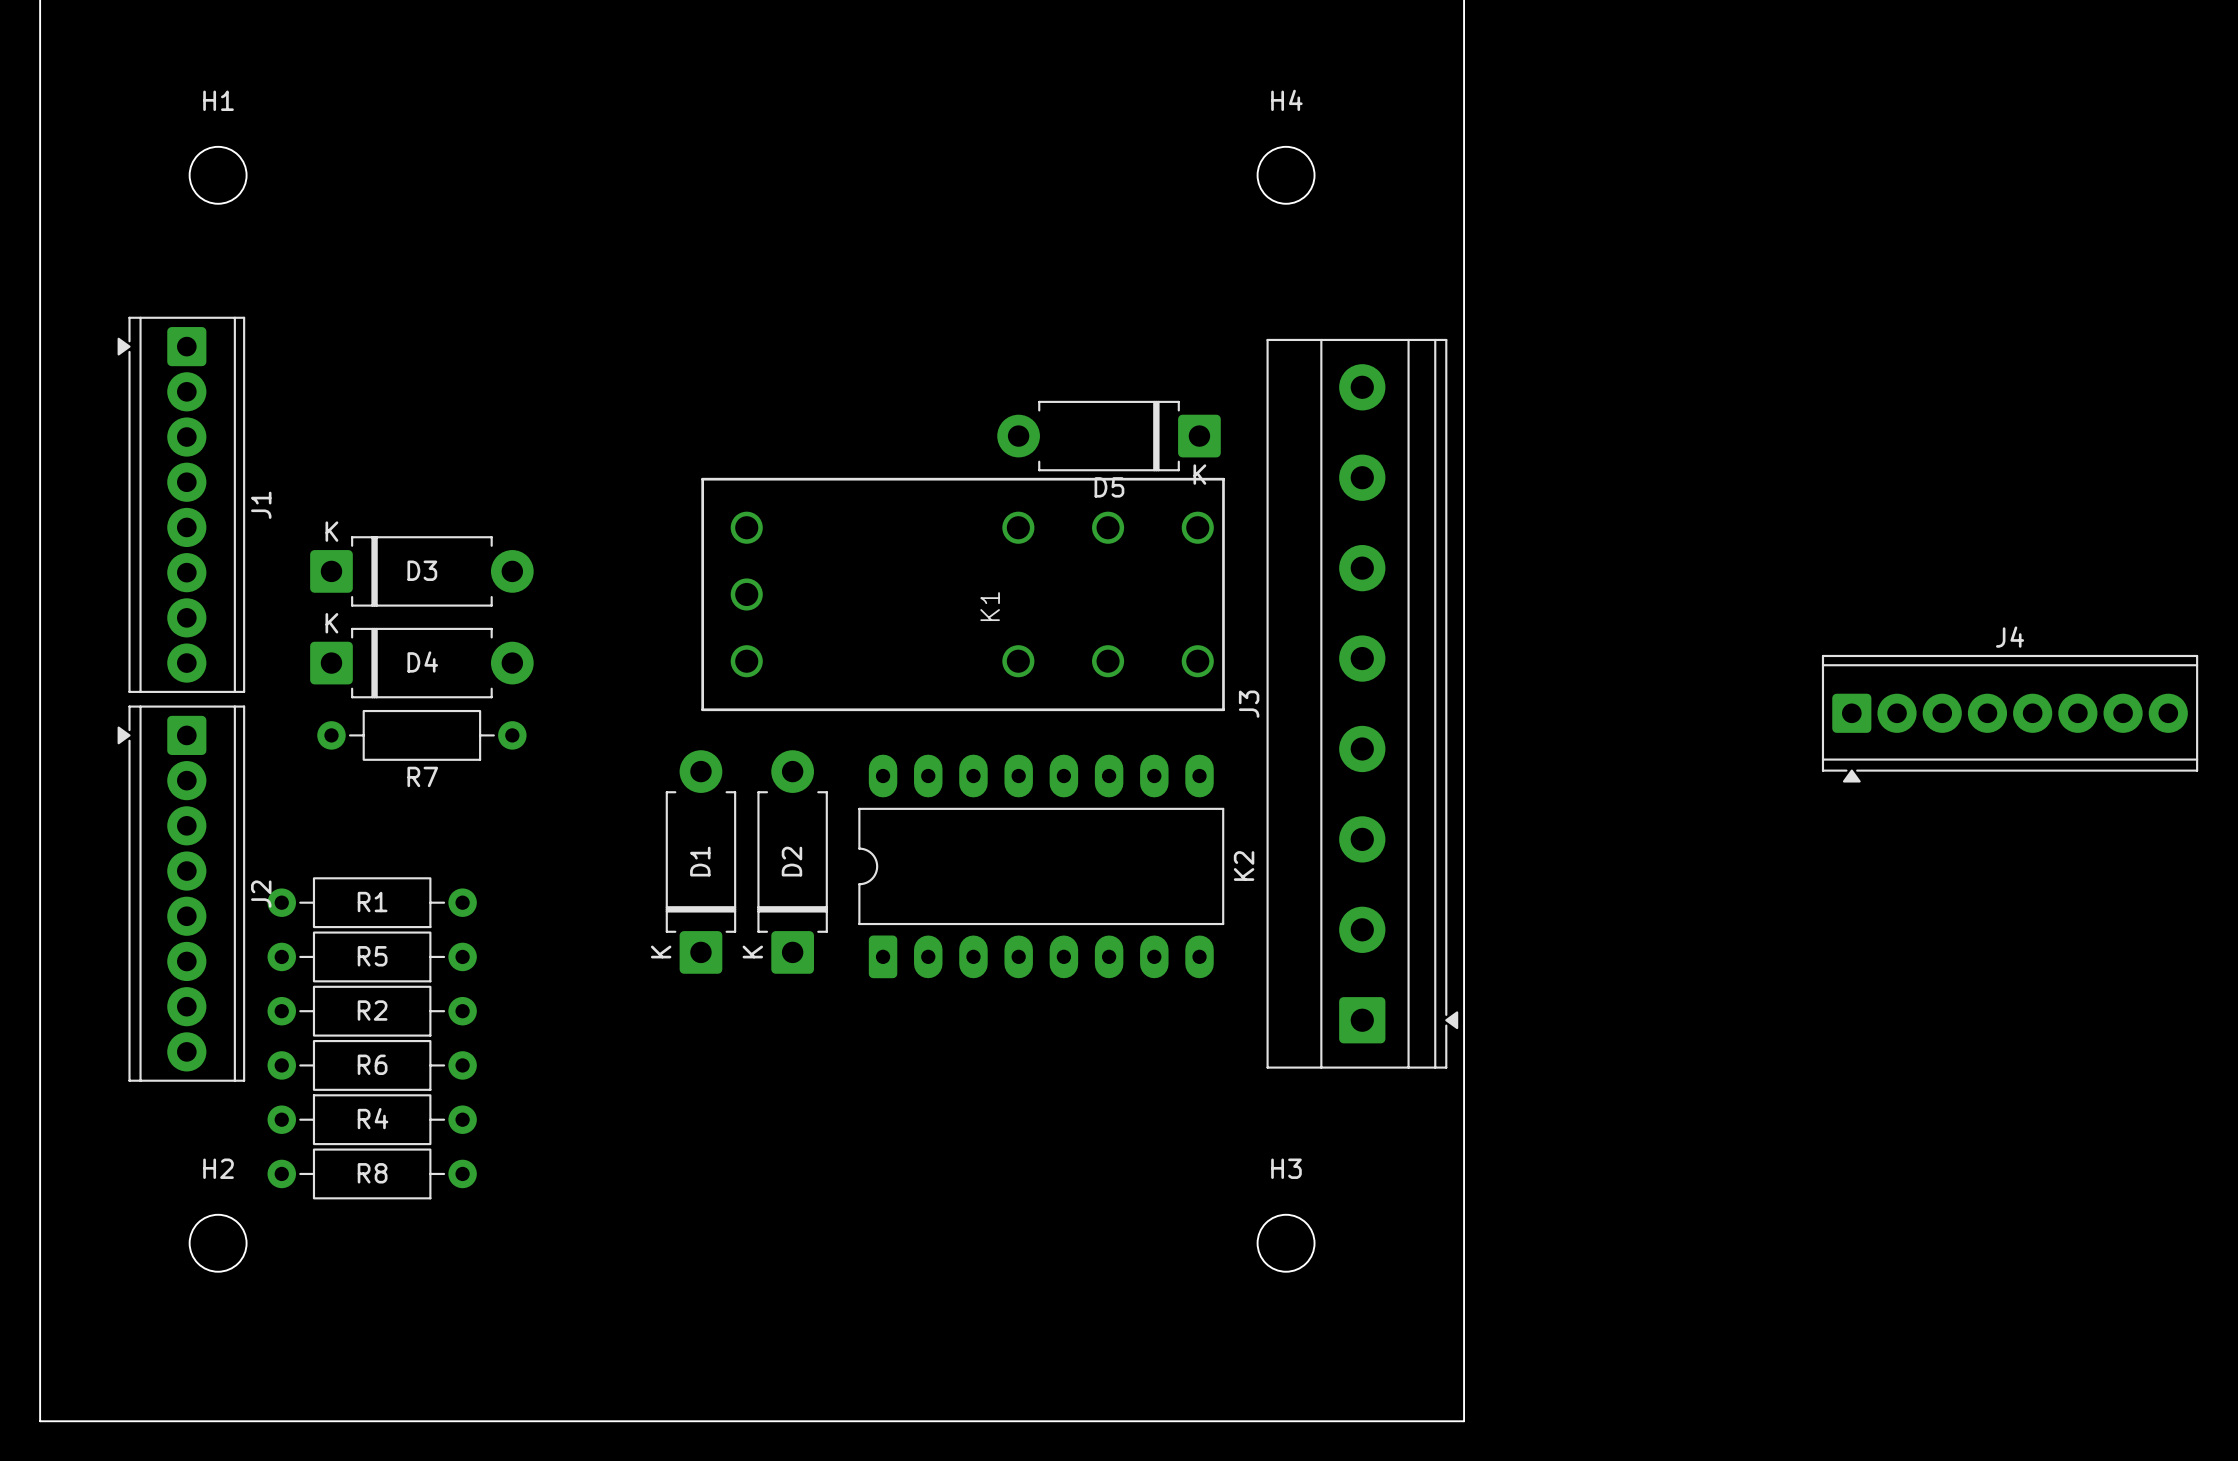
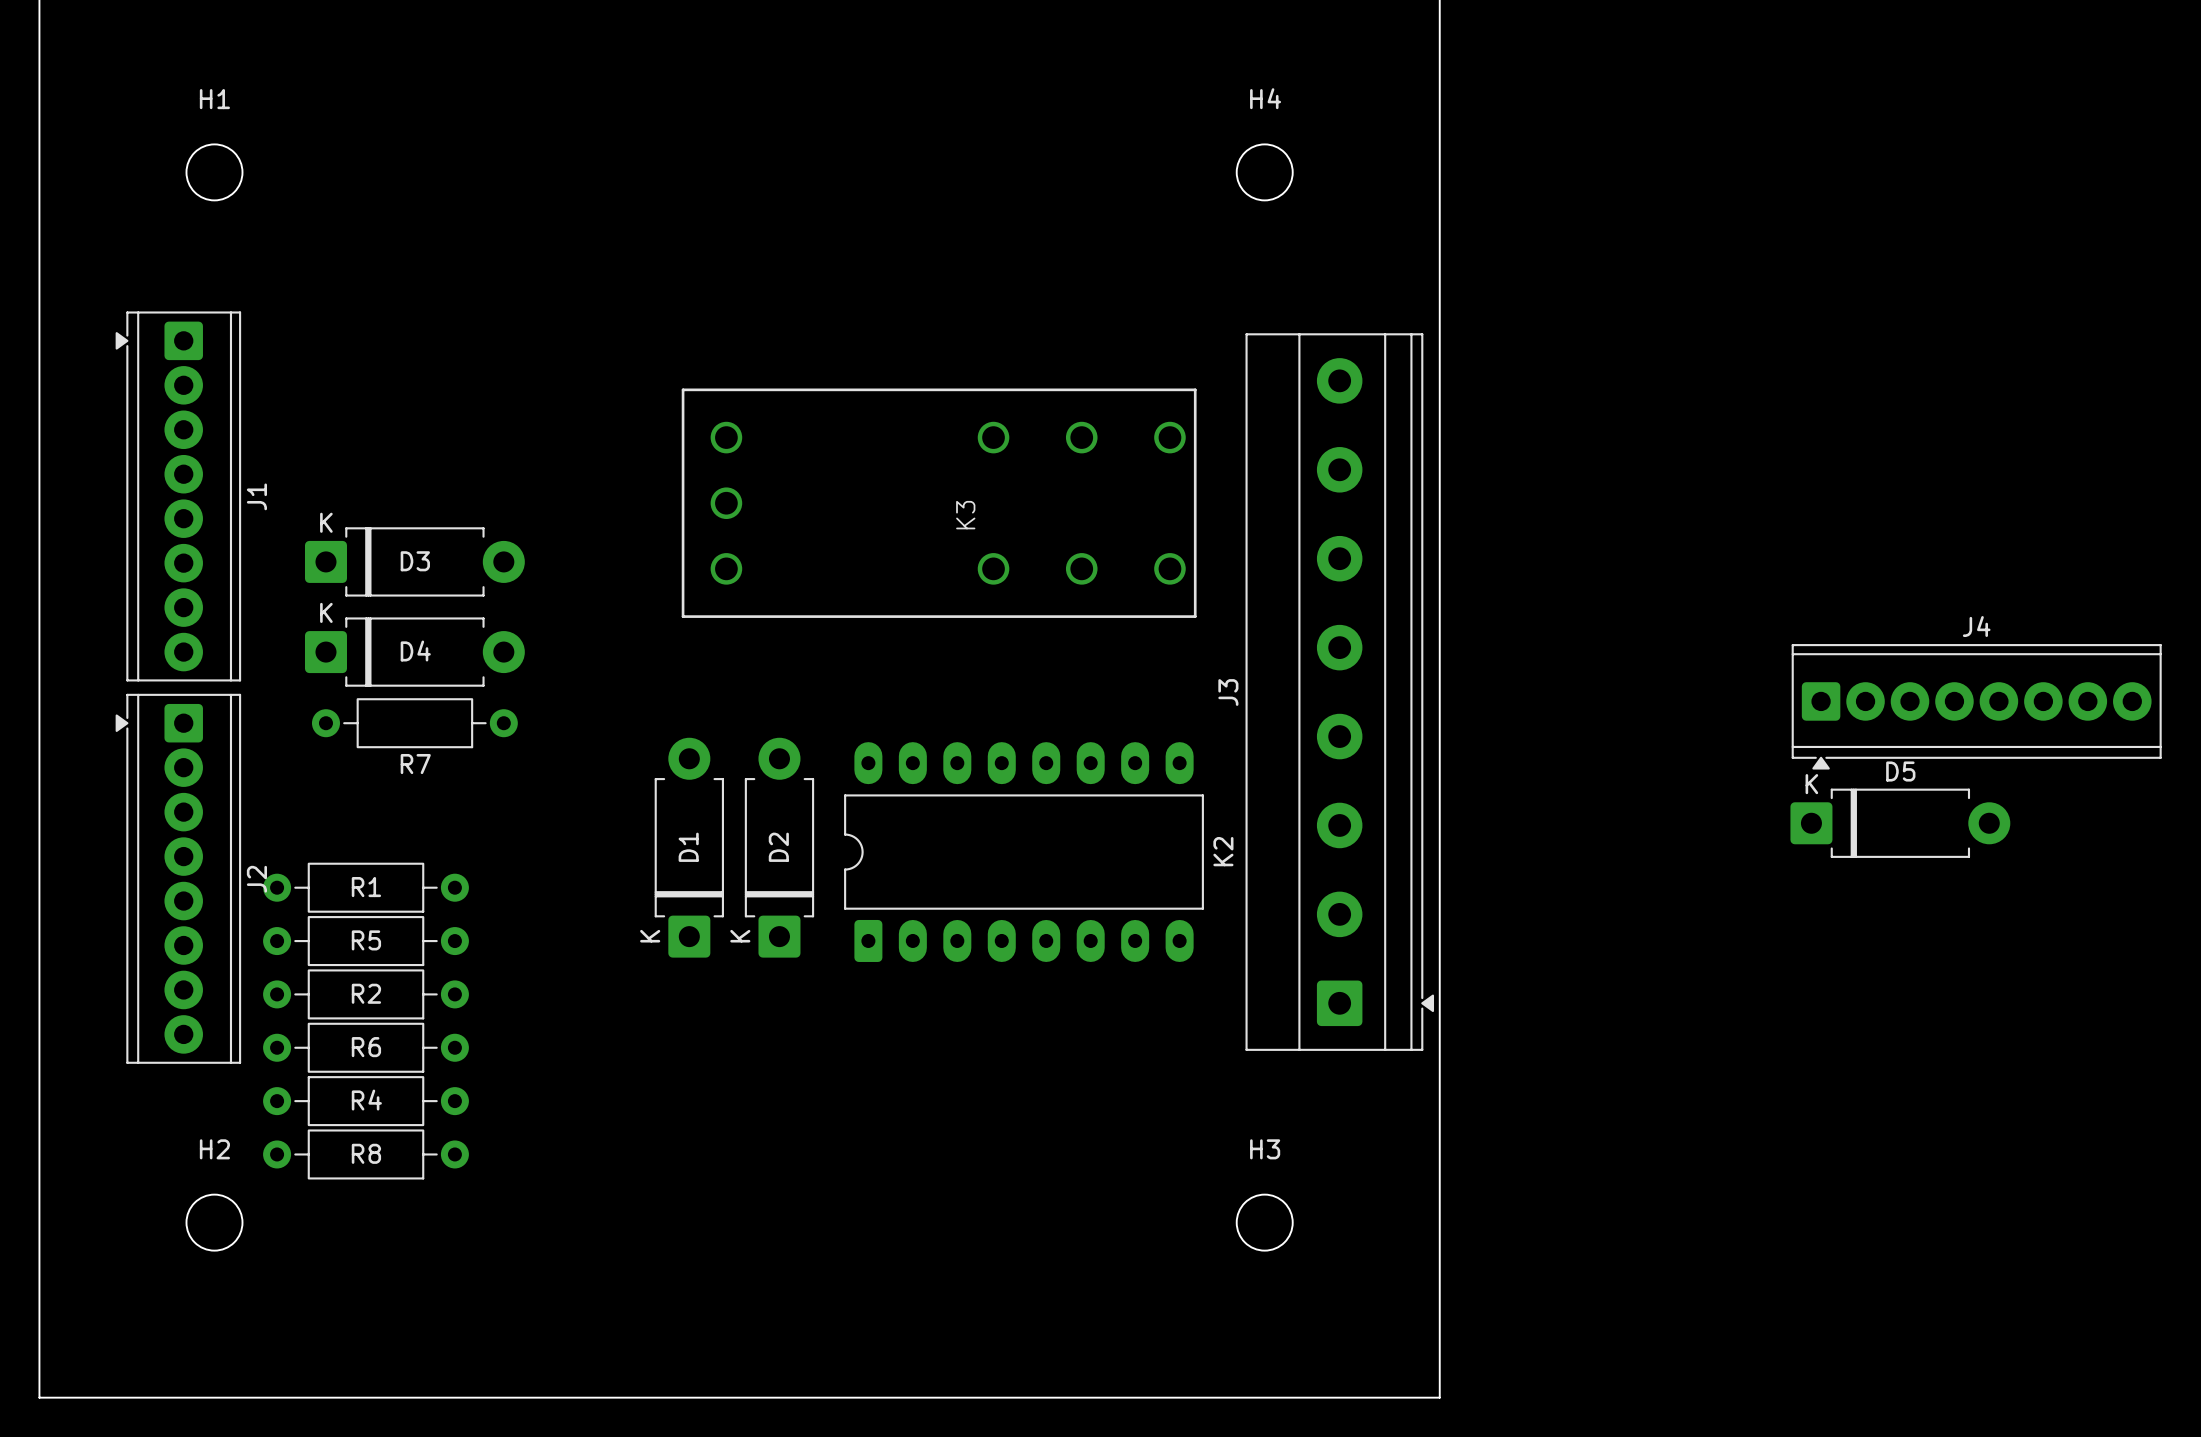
D5 rotation: 0° (1109, 436) -> 180° (1900, 823)
D5 position: (1109, 436) -> (1900, 823)
K3: none -> (939, 503)
K1: (963, 594) -> none

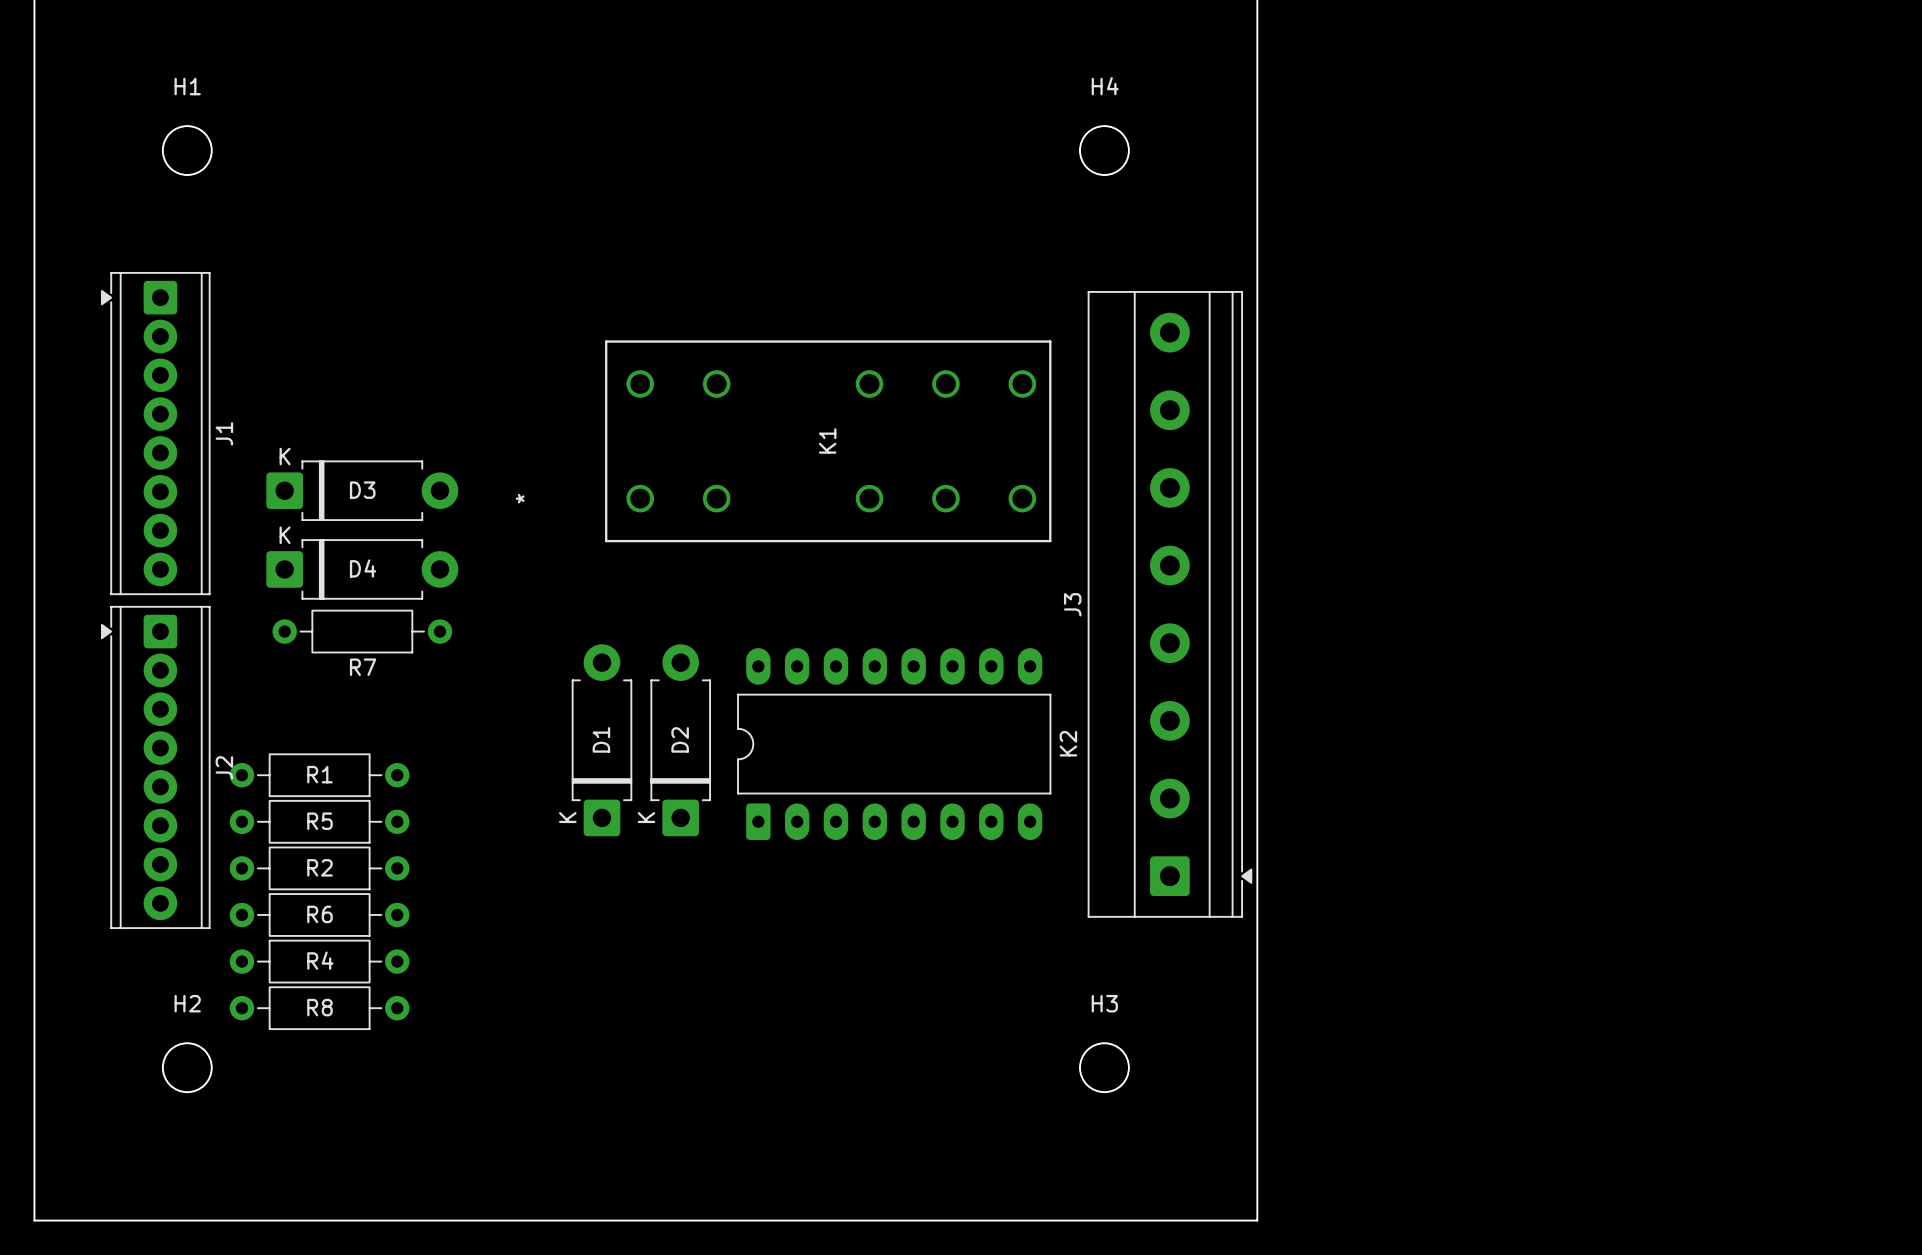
K3: (939, 503) -> none
K1: none -> (828, 441)
J4: (1976, 706) -> none
D5: (1900, 823) -> none

